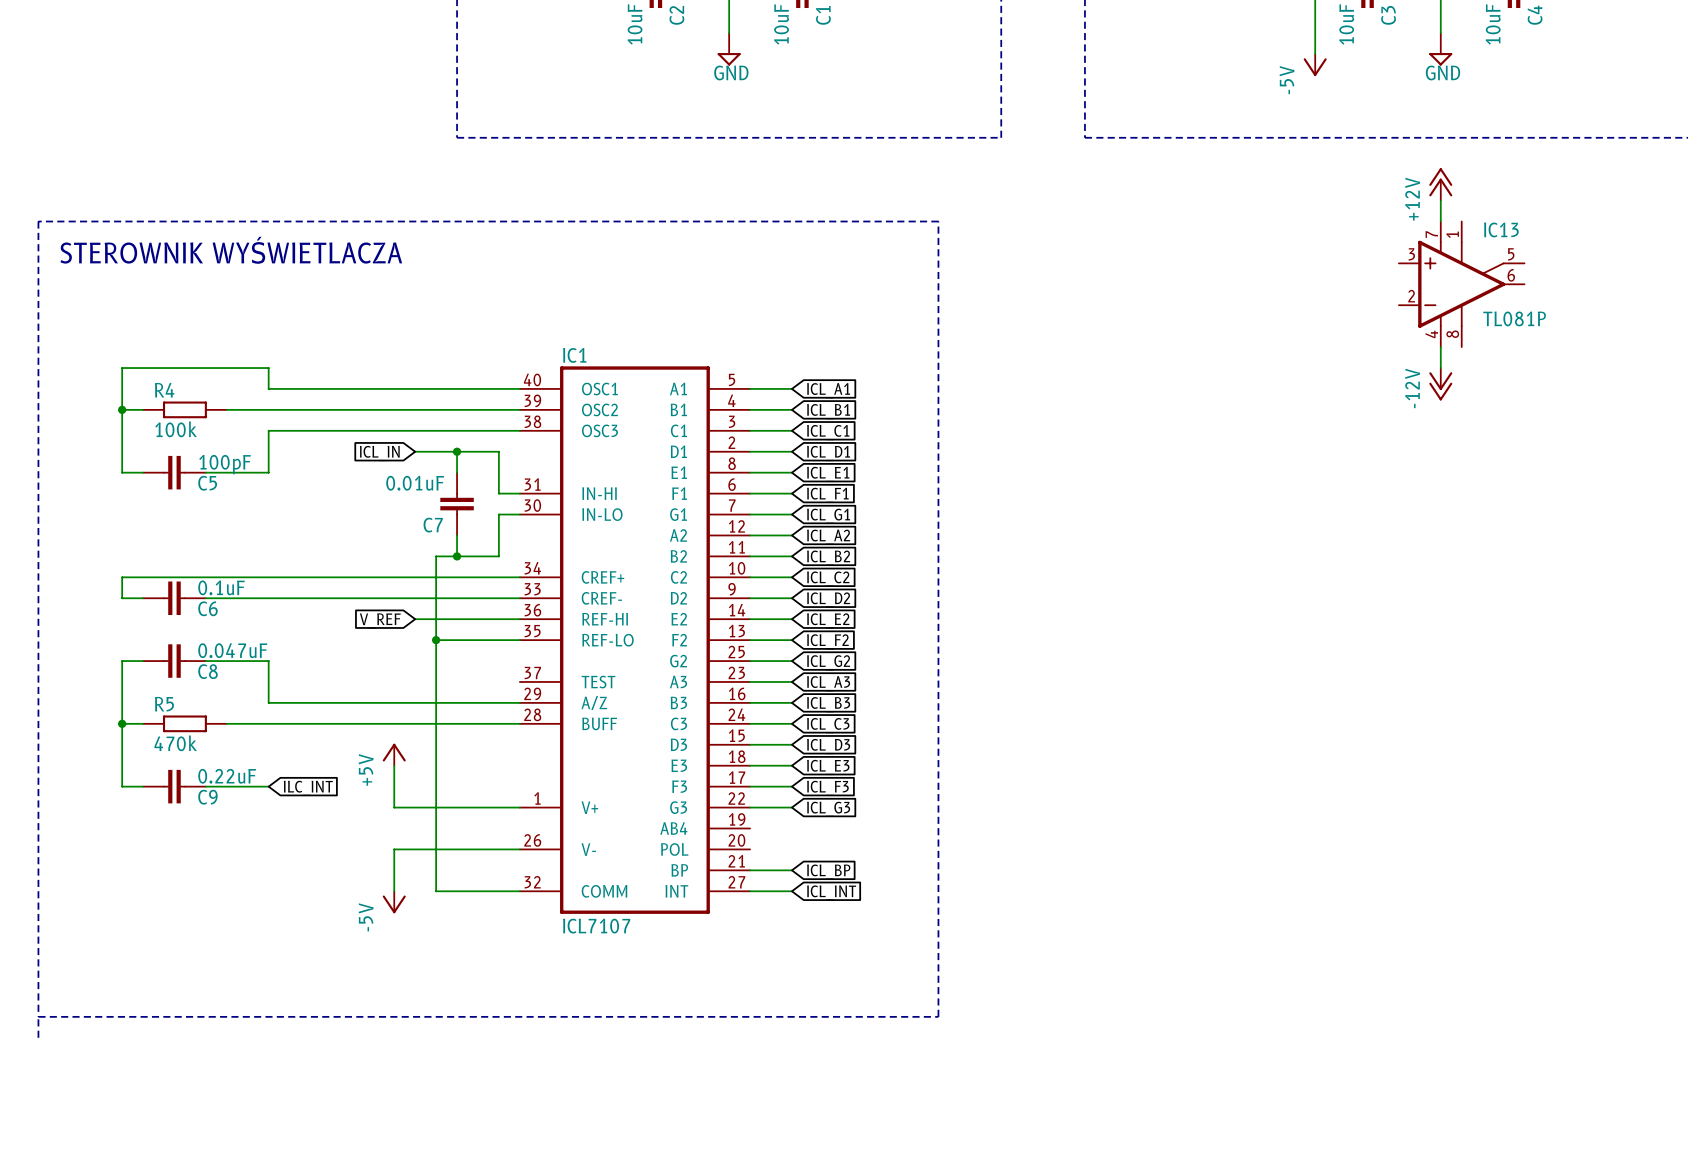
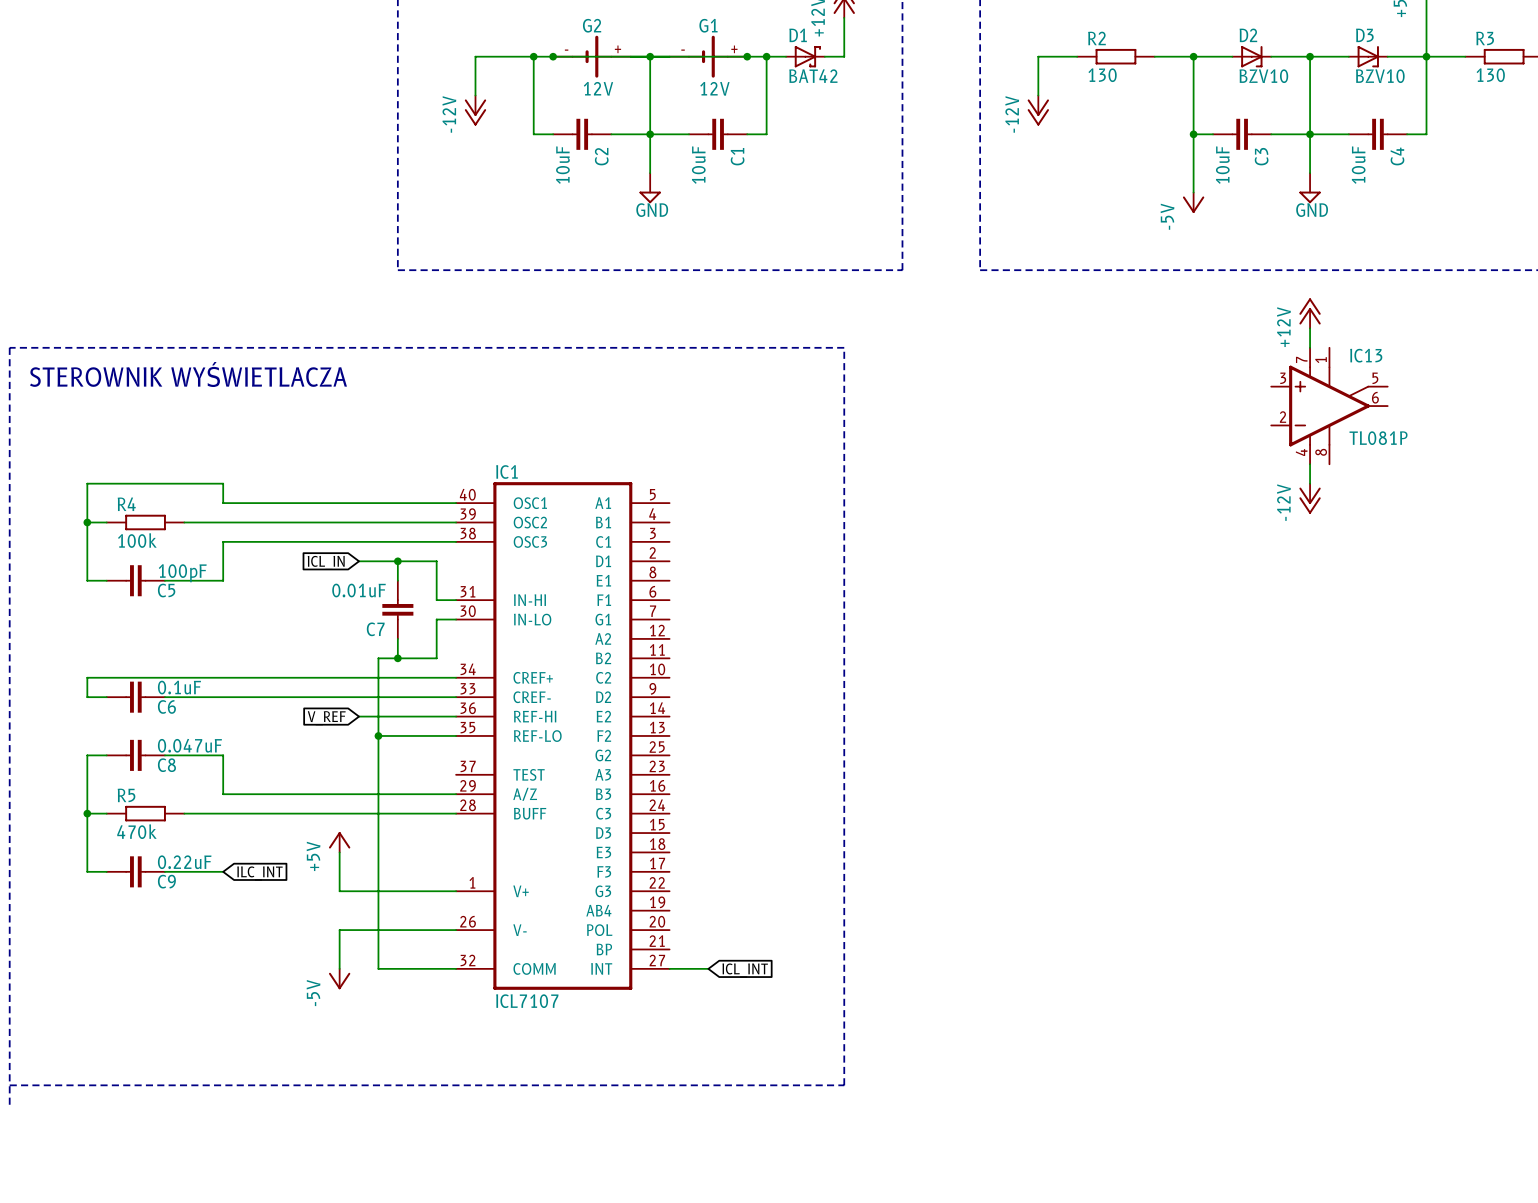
wire: (750, 388) (791, 388) -> none
global label: ICL_A1 (828, 390) -> none
wire: (750, 409) (791, 409) -> none
global label: ICL_B1 (828, 411) -> none
wire: (750, 430) (791, 430) -> none
global label: ICL_C1 (828, 432) -> none
wire: (750, 451) (791, 451) -> none
global label: ICL_D1 (828, 453) -> none
wire: (750, 472) (791, 472) -> none
global label: ICL_E1 (828, 474) -> none
wire: (750, 493) (791, 493) -> none
global label: ICL_F1 (827, 495) -> none
wire: (750, 514) (791, 514) -> none
global label: ICL_G1 (828, 516) -> none
wire: (750, 535) (791, 535) -> none
global label: ICL_A2 (828, 537) -> none
wire: (750, 556) (791, 556) -> none
global label: ICL_B2 (828, 558) -> none
wire: (750, 577) (791, 577) -> none
global label: ICL_C2 (828, 579) -> none
wire: (750, 598) (791, 598) -> none
global label: ICL_D2 (828, 600) -> none
wire: (750, 619) (791, 619) -> none
global label: ICL_E2 (828, 620) -> none
wire: (750, 640) (791, 640) -> none
global label: ICL_F2 (827, 641) -> none
wire: (750, 661) (791, 661) -> none
global label: ICL_G2 (828, 662) -> none
wire: (750, 681) (791, 681) -> none
global label: ICL_A3 (828, 683) -> none
wire: (750, 702) (791, 702) -> none
global label: ICL_B3 (828, 704) -> none
wire: (750, 723) (791, 723) -> none
global label: ICL_C3 (828, 725) -> none
wire: (750, 744) (791, 744) -> none
global label: ICL_D3 (828, 746) -> none
wire: (750, 765) (791, 765) -> none
global label: ICL_E3 (828, 767) -> none
wire: (750, 786) (791, 786) -> none
global label: ICL_F3 (827, 788) -> none
wire: (750, 807) (791, 807) -> none
global label: ICL_G3 (828, 809) -> none
wire: (750, 870) (791, 870) -> none
global label: ICL_BP (828, 872) -> none

